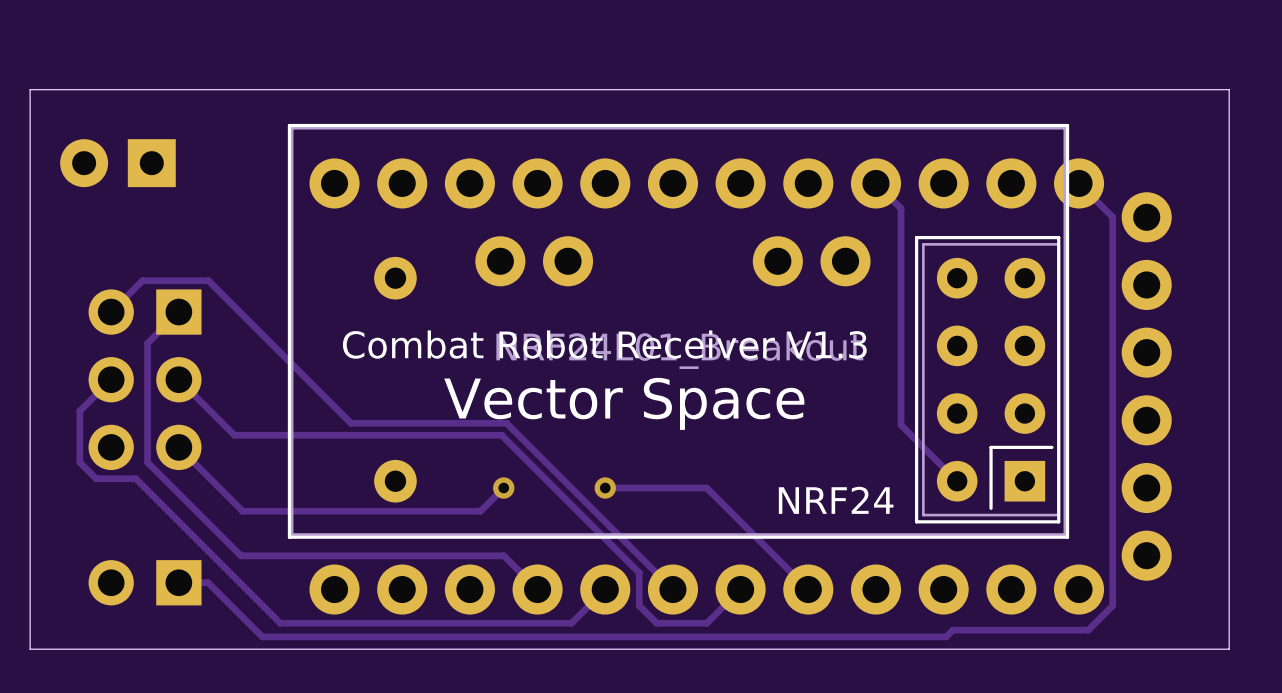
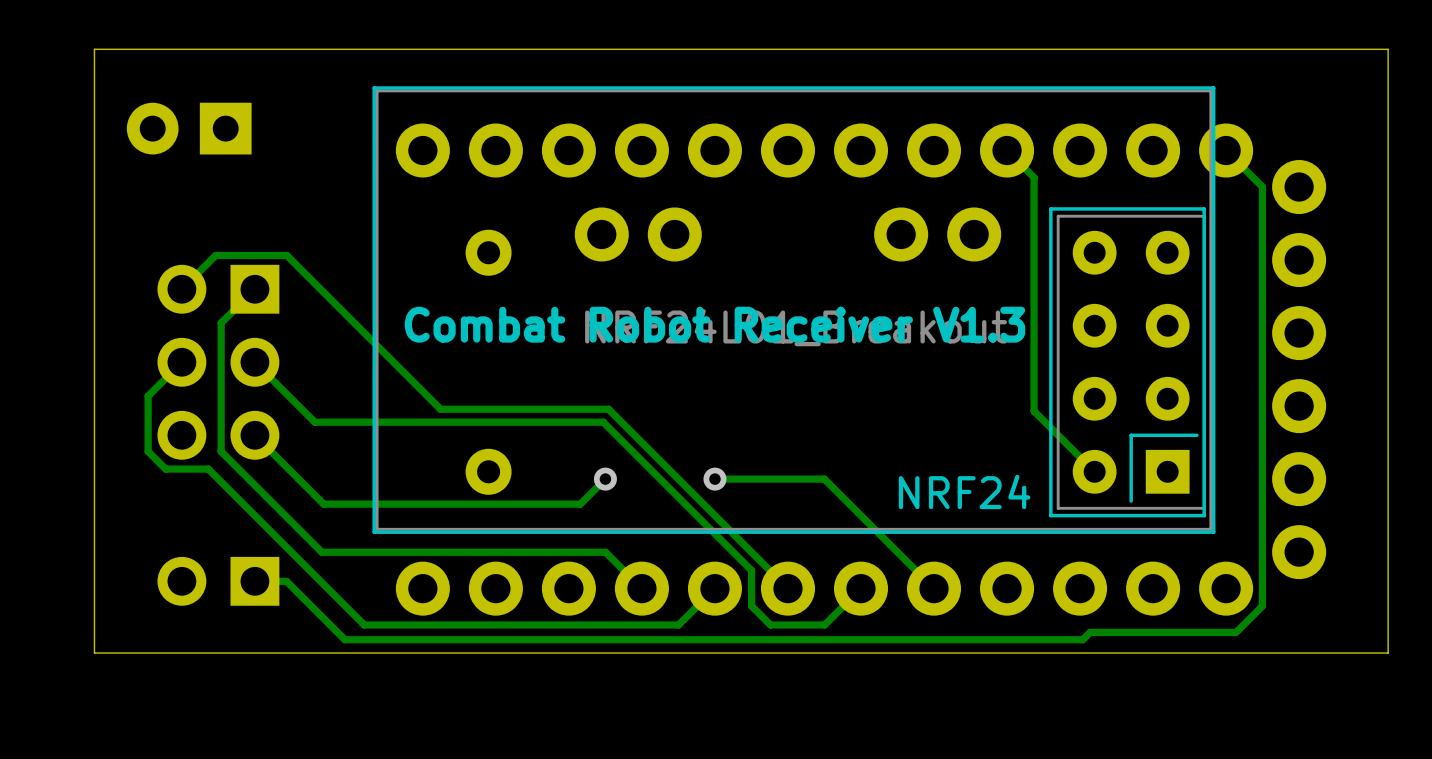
text: Vector Space (624, 403) -> none

